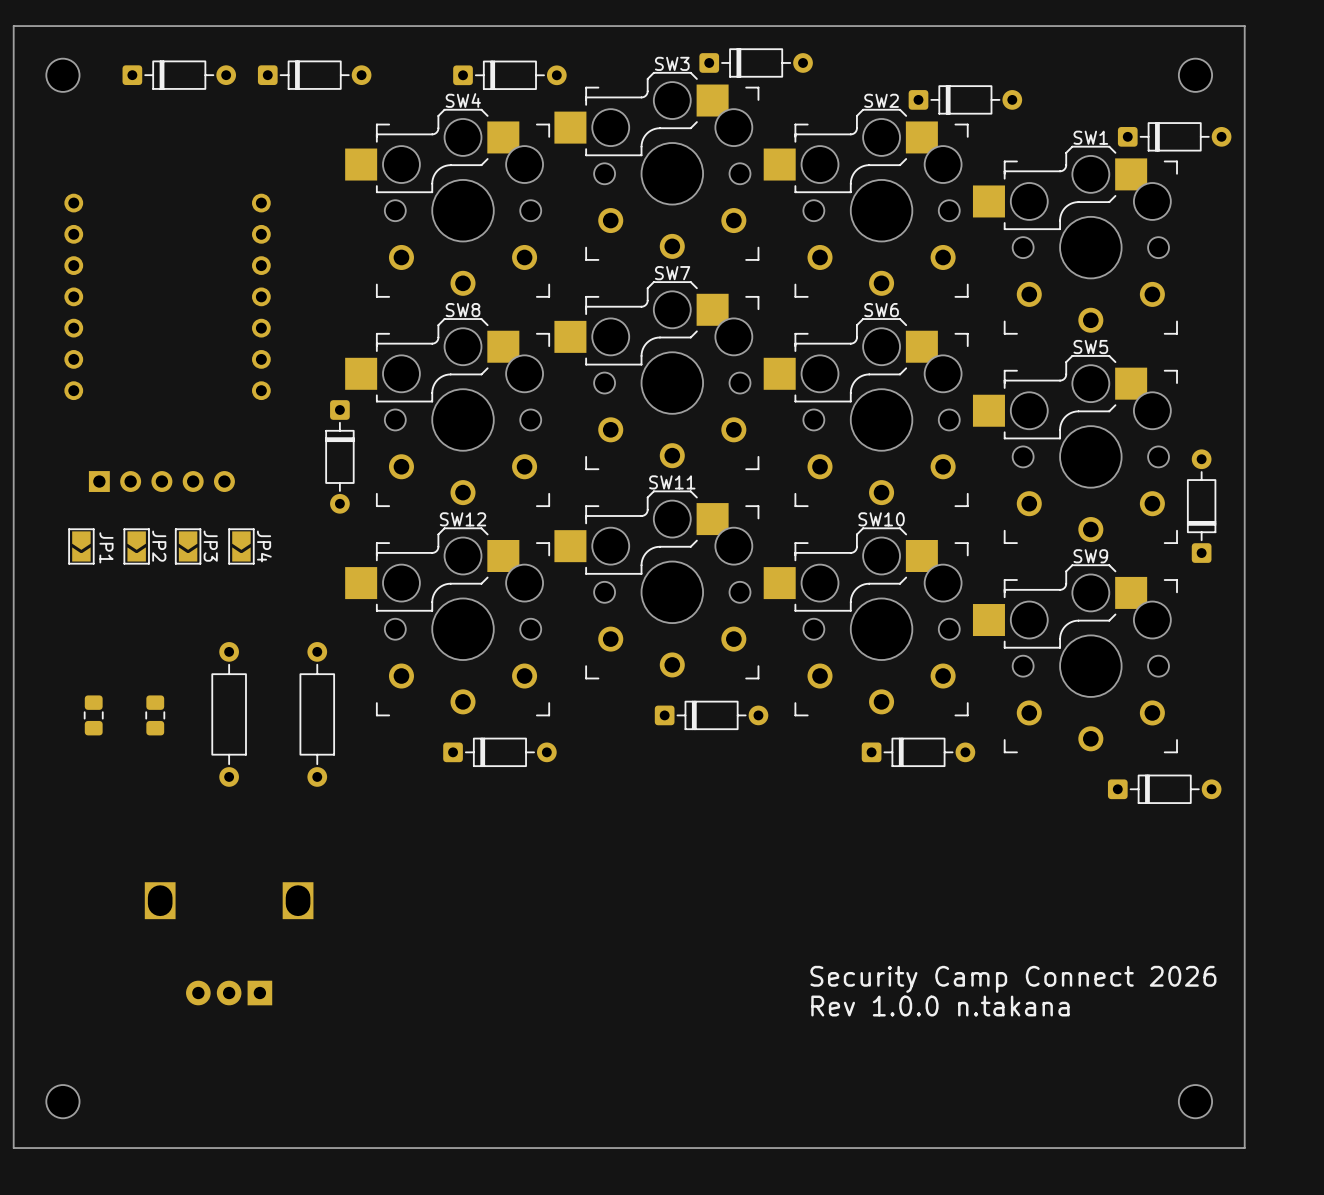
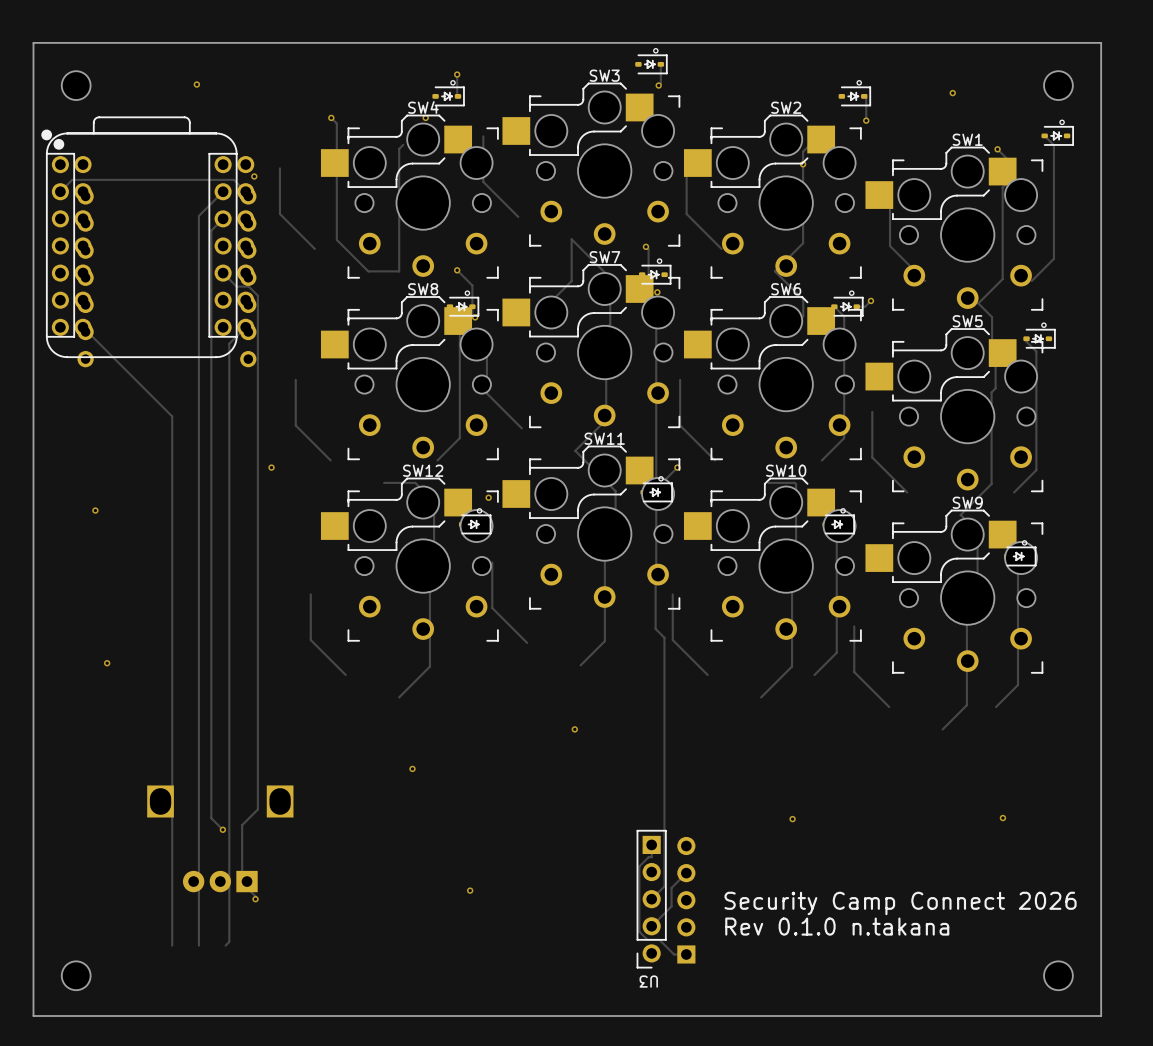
part: none -> (651, 61)
track: none -> (660, 64) (660, 83) (658, 85)
track: none -> (457, 74) (457, 96)
via: none -> (457, 74)
part: (756, 62) -> none
via: none -> (196, 84)
part: (179, 75) -> none
part: (314, 75) -> none
part: (509, 75) -> none
via: none -> (658, 85)
part: none -> (448, 93)
part: none -> (854, 93)
via: none -> (952, 93)
track: none -> (864, 96) (866, 98) (866, 120)
part: (965, 99) -> none
track: none -> (331, 117) (336, 123) (336, 239) (368, 271) (399, 271) (399, 148) (403, 144)
via: none -> (331, 117)
via: none -> (425, 117)
via: none -> (866, 120)
part: none -> (1057, 132)
track: none -> (483, 136) (483, 181) (518, 216)
track: none -> (1044, 135) (1053, 145) (1053, 258) (1031, 280)
part: (1174, 136) -> none
track: none -> (809, 144) (803, 151) (803, 243) (774, 271) (803, 299) (803, 316)
track: none -> (997, 149) (1008, 159) (1013, 159) (1013, 176) (1002, 187) (1002, 279) (978, 303) (992, 317) (992, 348) (995, 351) (995, 388) (991, 392) (991, 483) (960, 514) (977, 531) (977, 602) (966, 613) (966, 705) (942, 729)
via: none -> (997, 149)
via: none -> (803, 164)
track: none -> (279, 168) (279, 213) (314, 248)
track: none -> (686, 168) (686, 213) (721, 248)
via: none -> (254, 176)
track: none -> (223, 191) (198, 215) (198, 945)
track: none -> (245, 191) (233, 179) (72, 179) (60, 191)
track: none -> (890, 200) (890, 246) (924, 280)
track: none -> (223, 218) (211, 230) (211, 818) (222, 829)
part: none -> (147, 237)
track: none -> (645, 246) (648, 249) (648, 293) (656, 301) (655, 628) (664, 637) (664, 886) (651, 899)
via: none -> (645, 246)
track: none -> (457, 270) (472, 285) (472, 314) (475, 317) (478, 313)
via: none -> (457, 270)
part: none -> (655, 271)
track: none -> (223, 273) (236, 286) (248, 286) (257, 295) (257, 809) (242, 825) (242, 882) (255, 896) (255, 899)
via: none -> (657, 292)
track: none -> (870, 300) (865, 306) (856, 306)
via: none -> (870, 300)
track: none -> (551, 301) (571, 281) (571, 239) (610, 277) (610, 324) (606, 328) (606, 419) (575, 450) (615, 491) (615, 538) (604, 549) (604, 641) (580, 665)
part: none -> (462, 303)
part: none -> (847, 303)
track: none -> (449, 306) (459, 316) (459, 438) (437, 460)
track: none -> (834, 306) (844, 316) (844, 438) (821, 460)
via: none -> (475, 317)
track: none -> (83, 327) (172, 416) (172, 945)
track: none -> (245, 327) (229, 343) (229, 941) (225, 945)
part: none -> (1039, 335)
track: none -> (1026, 338) (1026, 341) (1036, 351) (1036, 470) (1014, 492)
track: none -> (486, 347) (486, 393) (521, 428)
track: none -> (295, 379) (295, 425) (330, 460)
track: none -> (680, 379) (680, 425) (715, 460)
track: none -> (872, 411) (872, 457) (907, 492)
part: (339, 456) -> none
part: (161, 481) -> none
part: (1201, 506) -> none
via: none -> (271, 467)
track: none -> (677, 467) (666, 478) (666, 492)
via: none -> (677, 467)
track: none -> (384, 482) (415, 482) (434, 501) (434, 570) (429, 575) (429, 666) (399, 697)
track: none -> (768, 482) (796, 484) (796, 570) (792, 574) (792, 666) (761, 697)
part: none -> (656, 489)
JP1: (81, 546) -> none
JP2: (136, 546) -> none
JP3: (188, 546) -> none
JP4: (241, 546) -> none
via: none -> (488, 497)
via: none -> (95, 510)
part: none -> (475, 521)
part: none -> (838, 521)
track: none -> (837, 522) (836, 652) (814, 675)
part: none -> (1020, 553)
track: none -> (1007, 556) (1018, 567) (1018, 685) (995, 707)
track: none -> (492, 562) (492, 608) (527, 642)
track: none -> (310, 594) (310, 640) (345, 675)
track: none -> (672, 594) (672, 640) (707, 675)
track: none -> (854, 626) (854, 672) (889, 707)
part: (229, 714) -> none
part: (317, 714) -> none
part: (93, 715) -> none
part: (155, 715) -> none
part: (711, 715) -> none
via: none -> (107, 663)
part: (499, 752) -> none
part: (918, 752) -> none
part: (1164, 789) -> none
via: none -> (574, 729)
via: none -> (412, 768)
via: none -> (1002, 818)
via: none -> (792, 819)
via: none -> (222, 829)
track: none -> (651, 844) (651, 857) (648, 857) (639, 866) (639, 931) (647, 939) (659, 939) (674, 954) (686, 954)
text position: Security Camp Connect 2026 (1013, 979) -> Security Camp Connect 2026 (900, 903)
track: none -> (686, 873) (671, 887) (671, 906) (651, 926)
via: none -> (470, 890)
text: Rev 1.0.0 n.takana (940, 1006) -> none
via: none -> (255, 899)
U3: none -> (651, 899)
part: none -> (686, 900)
text: none -> Rev 0.1.0 n.takana (837, 926)

